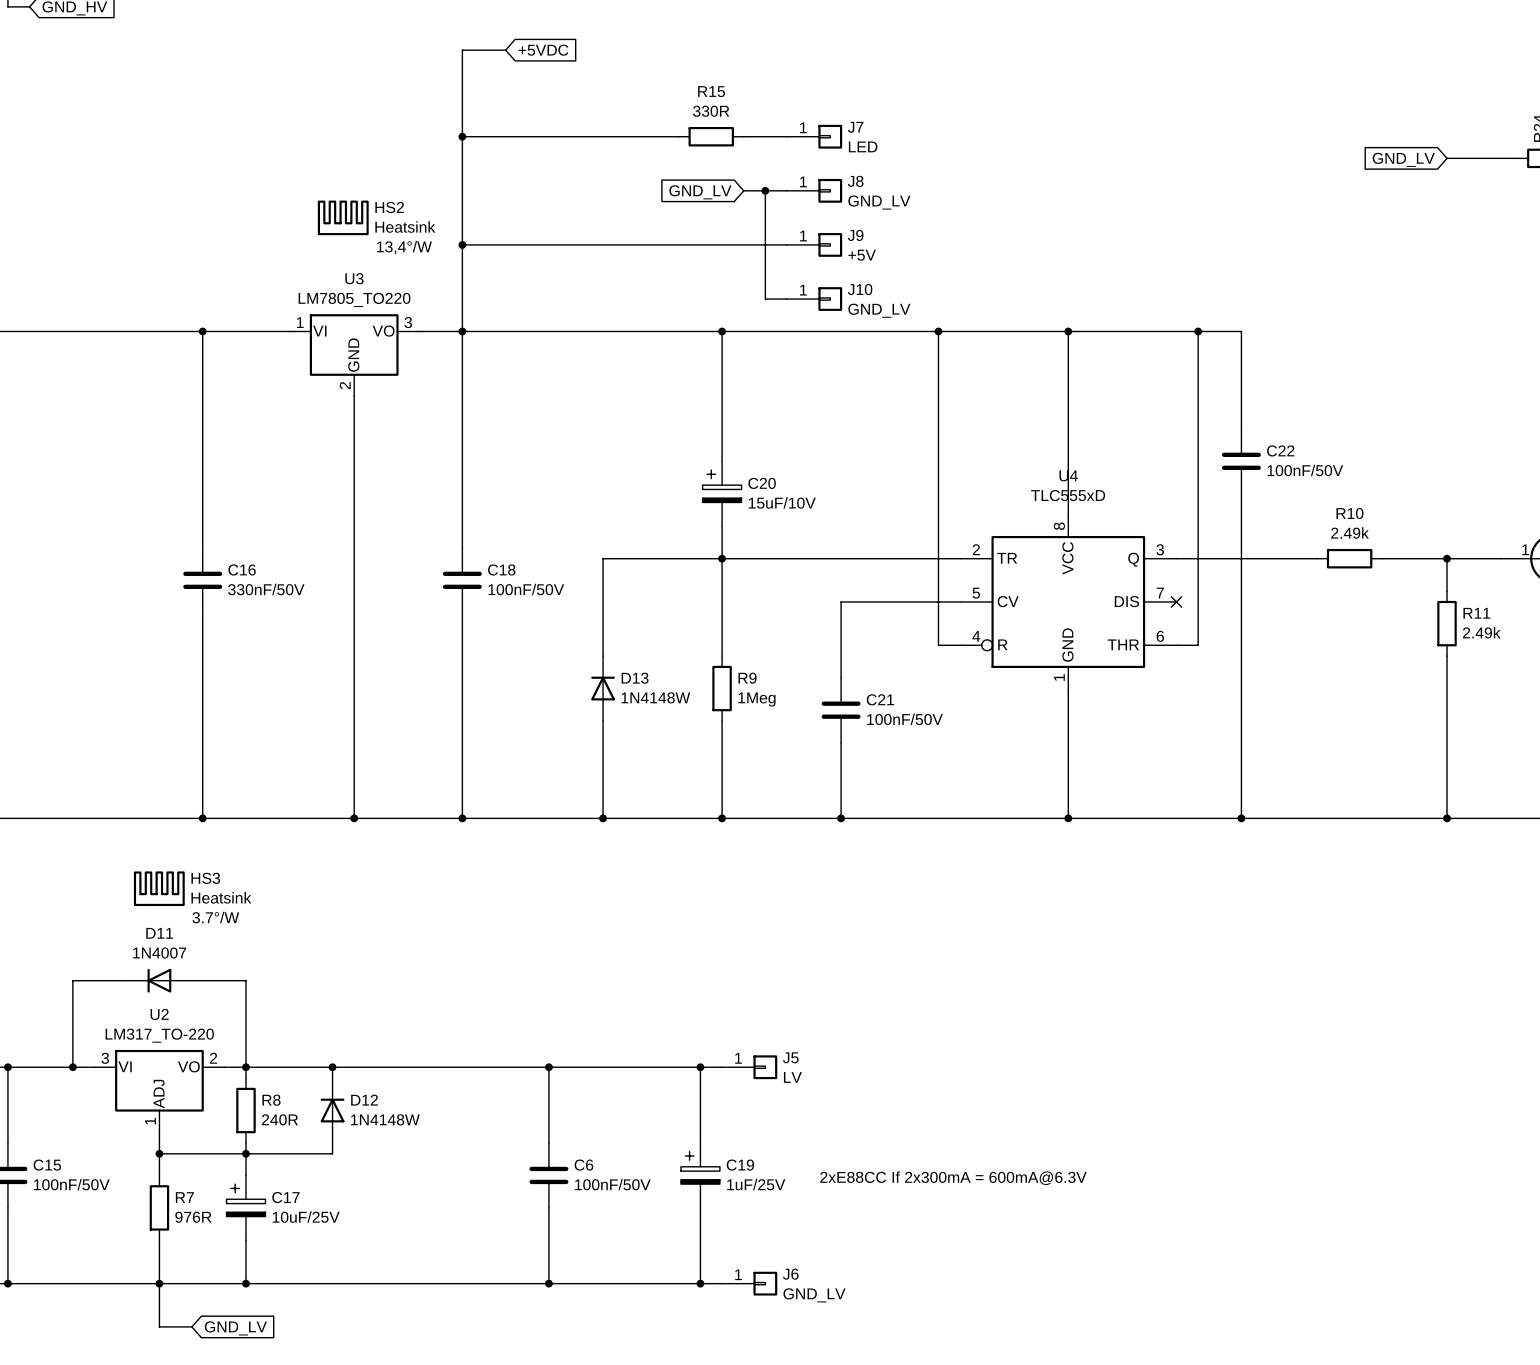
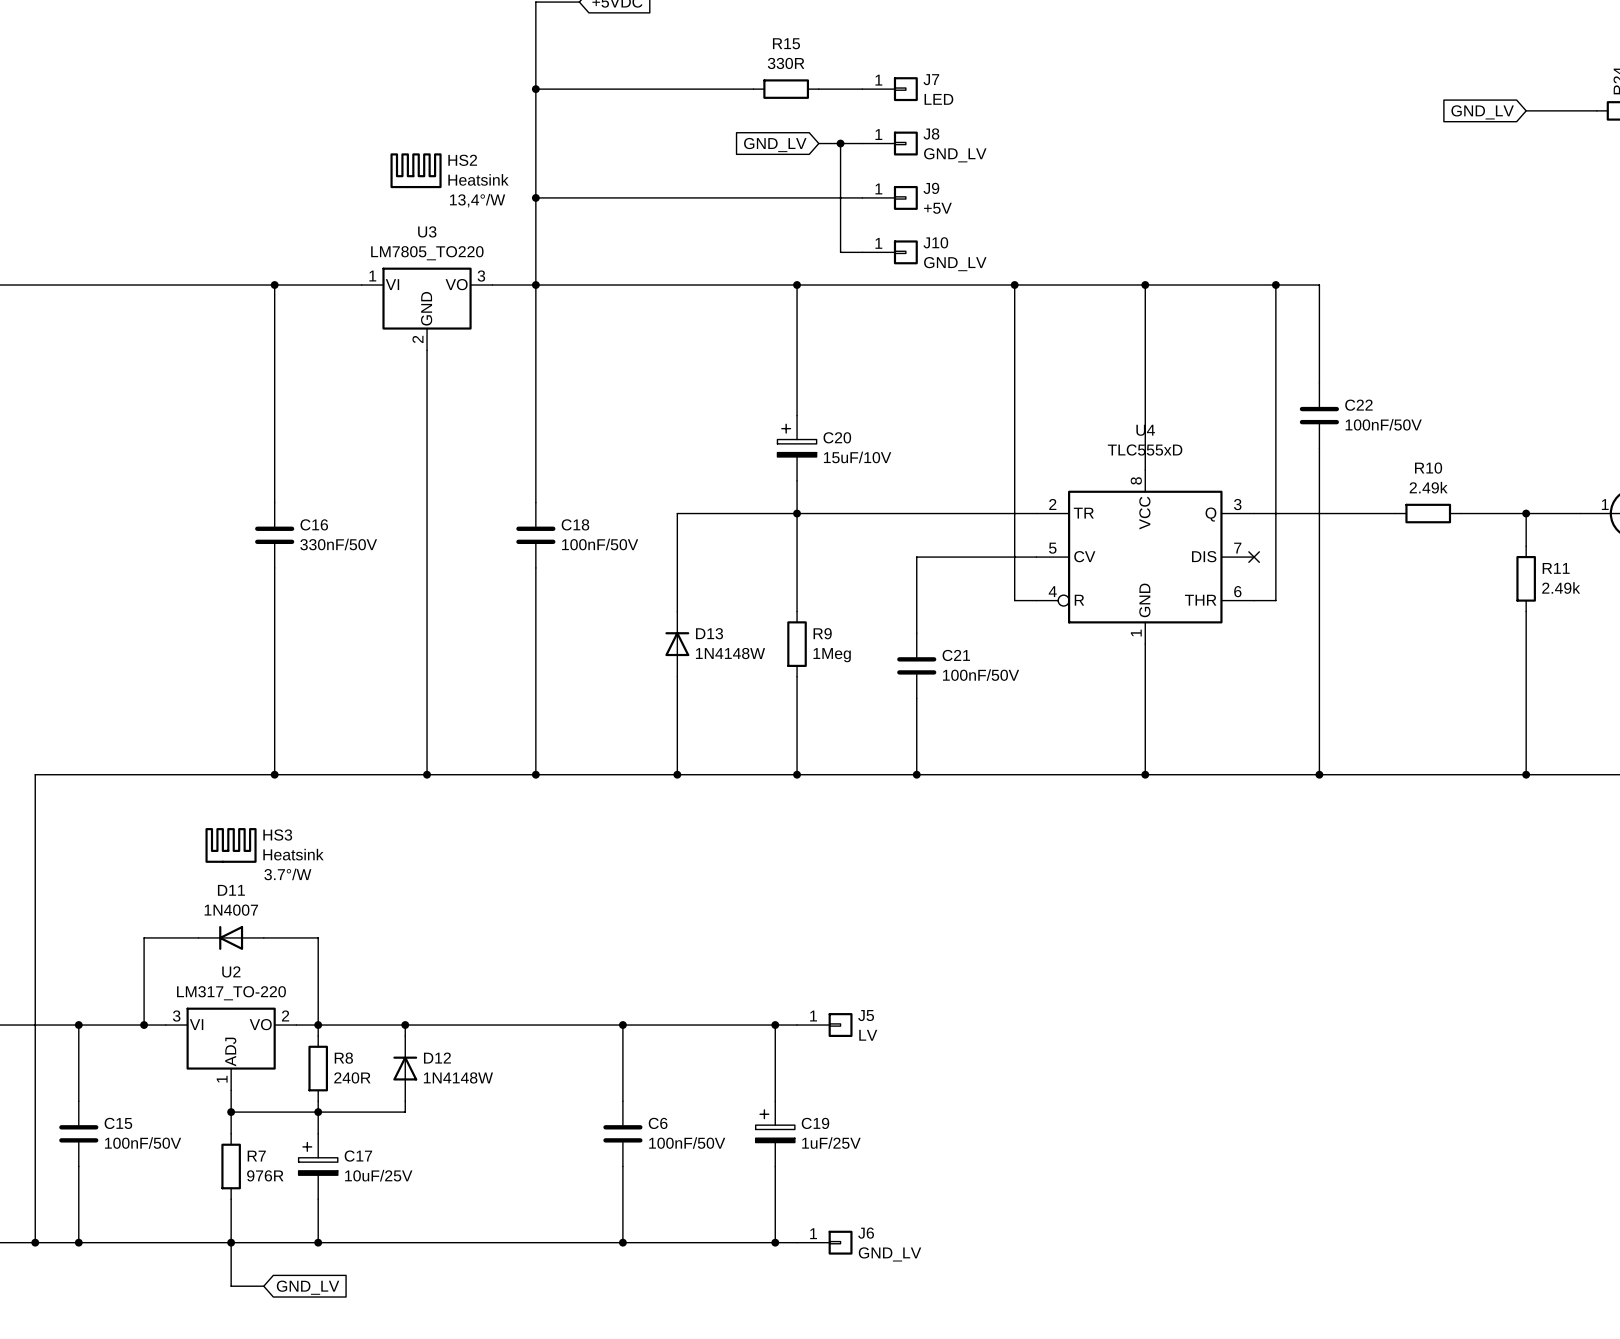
text: 2xE88CC If 2x300mA = 600mA@6.3V (953, 1178) -> none

